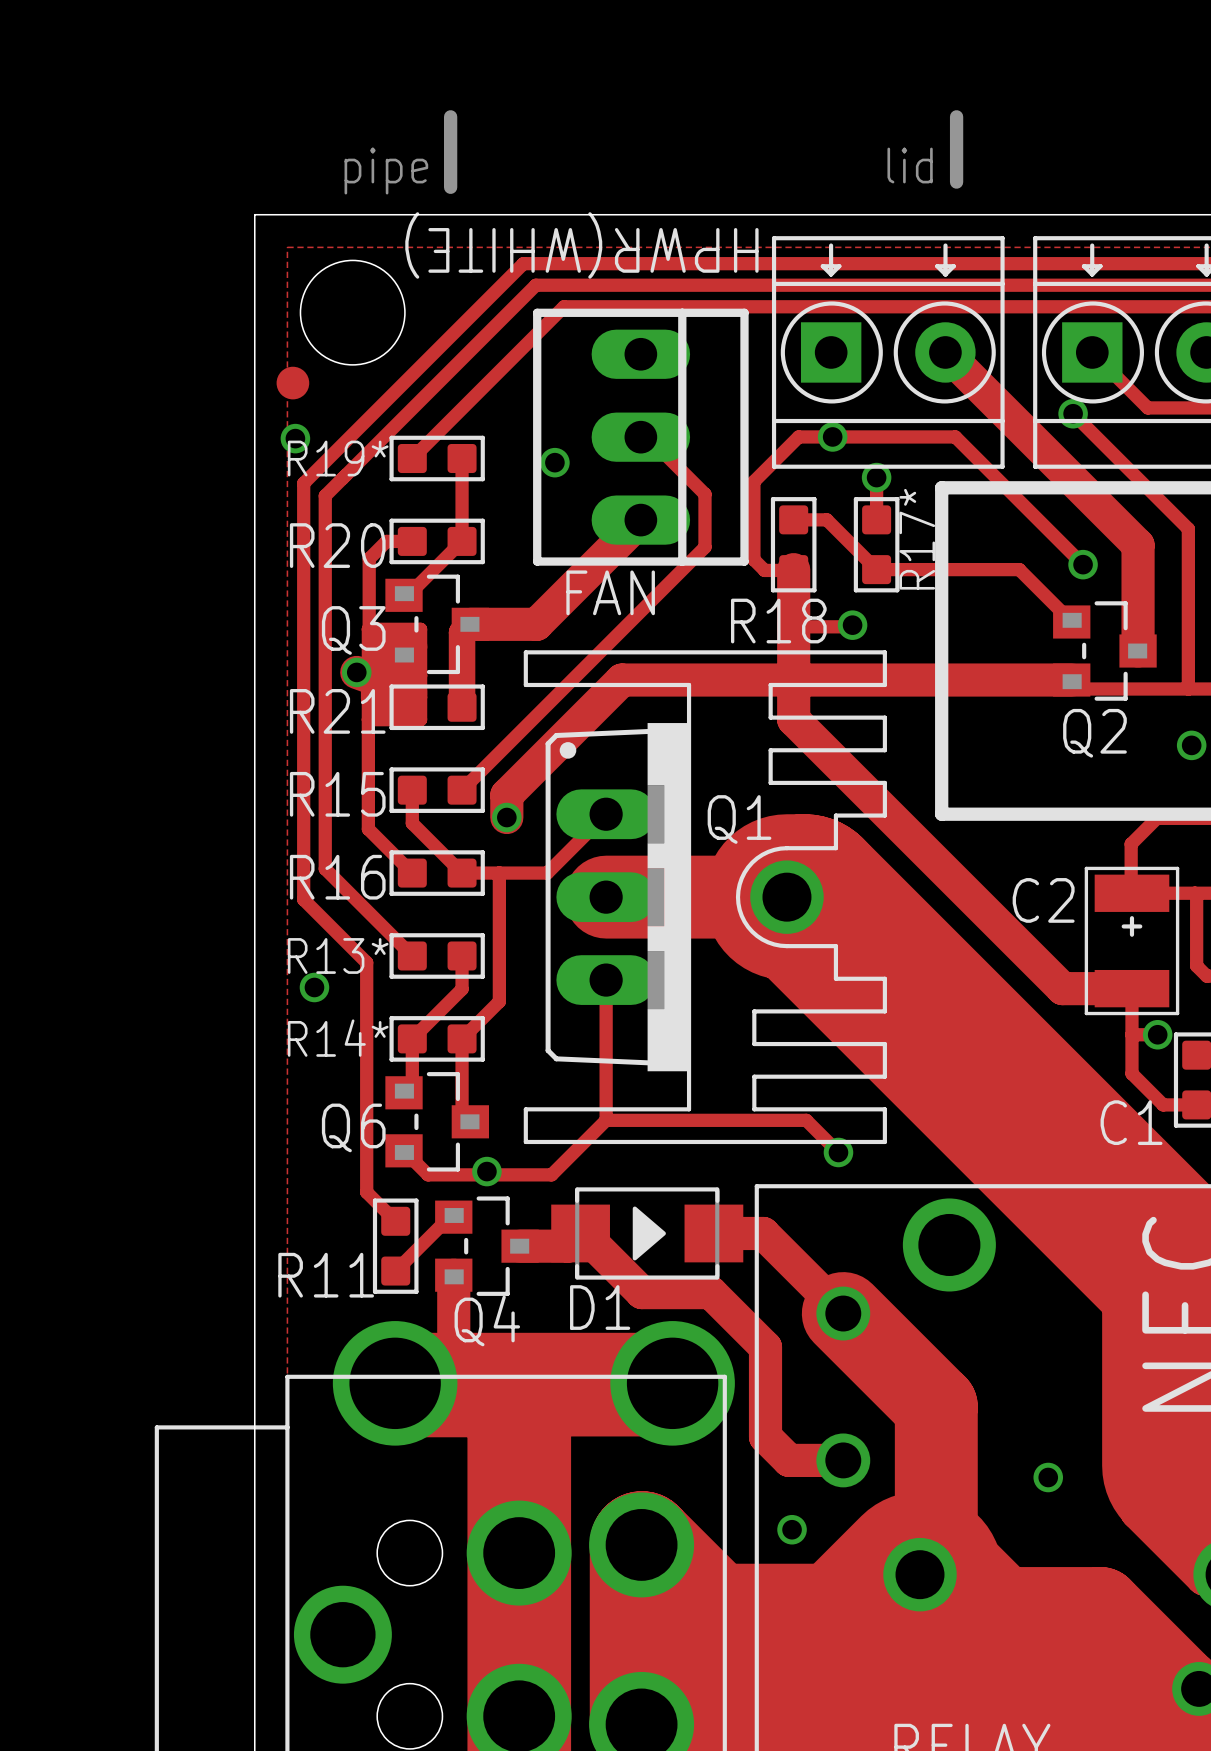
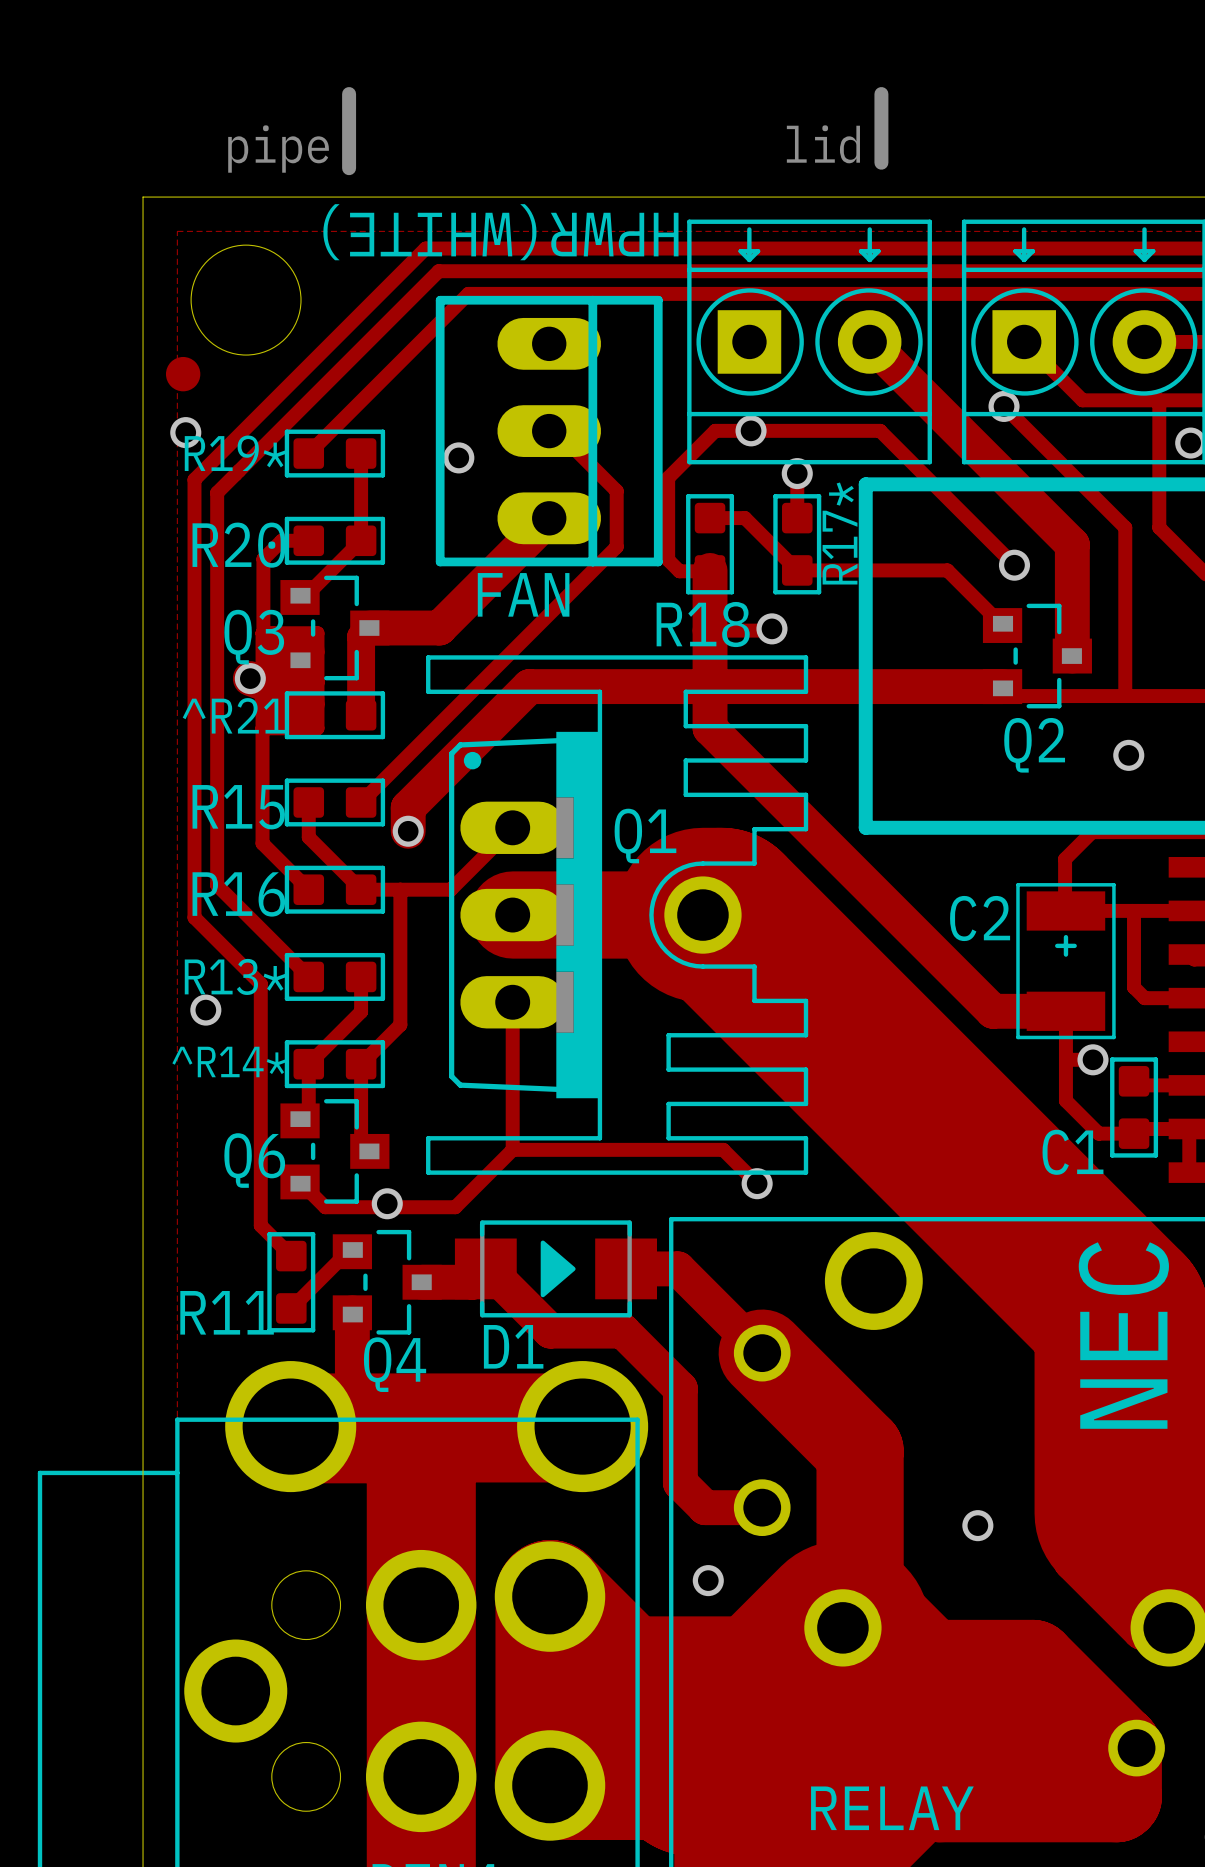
text: R21 (337, 711) -> ^R21 (234, 715)
text: R14* (338, 1038) -> ^R14* (229, 1061)

